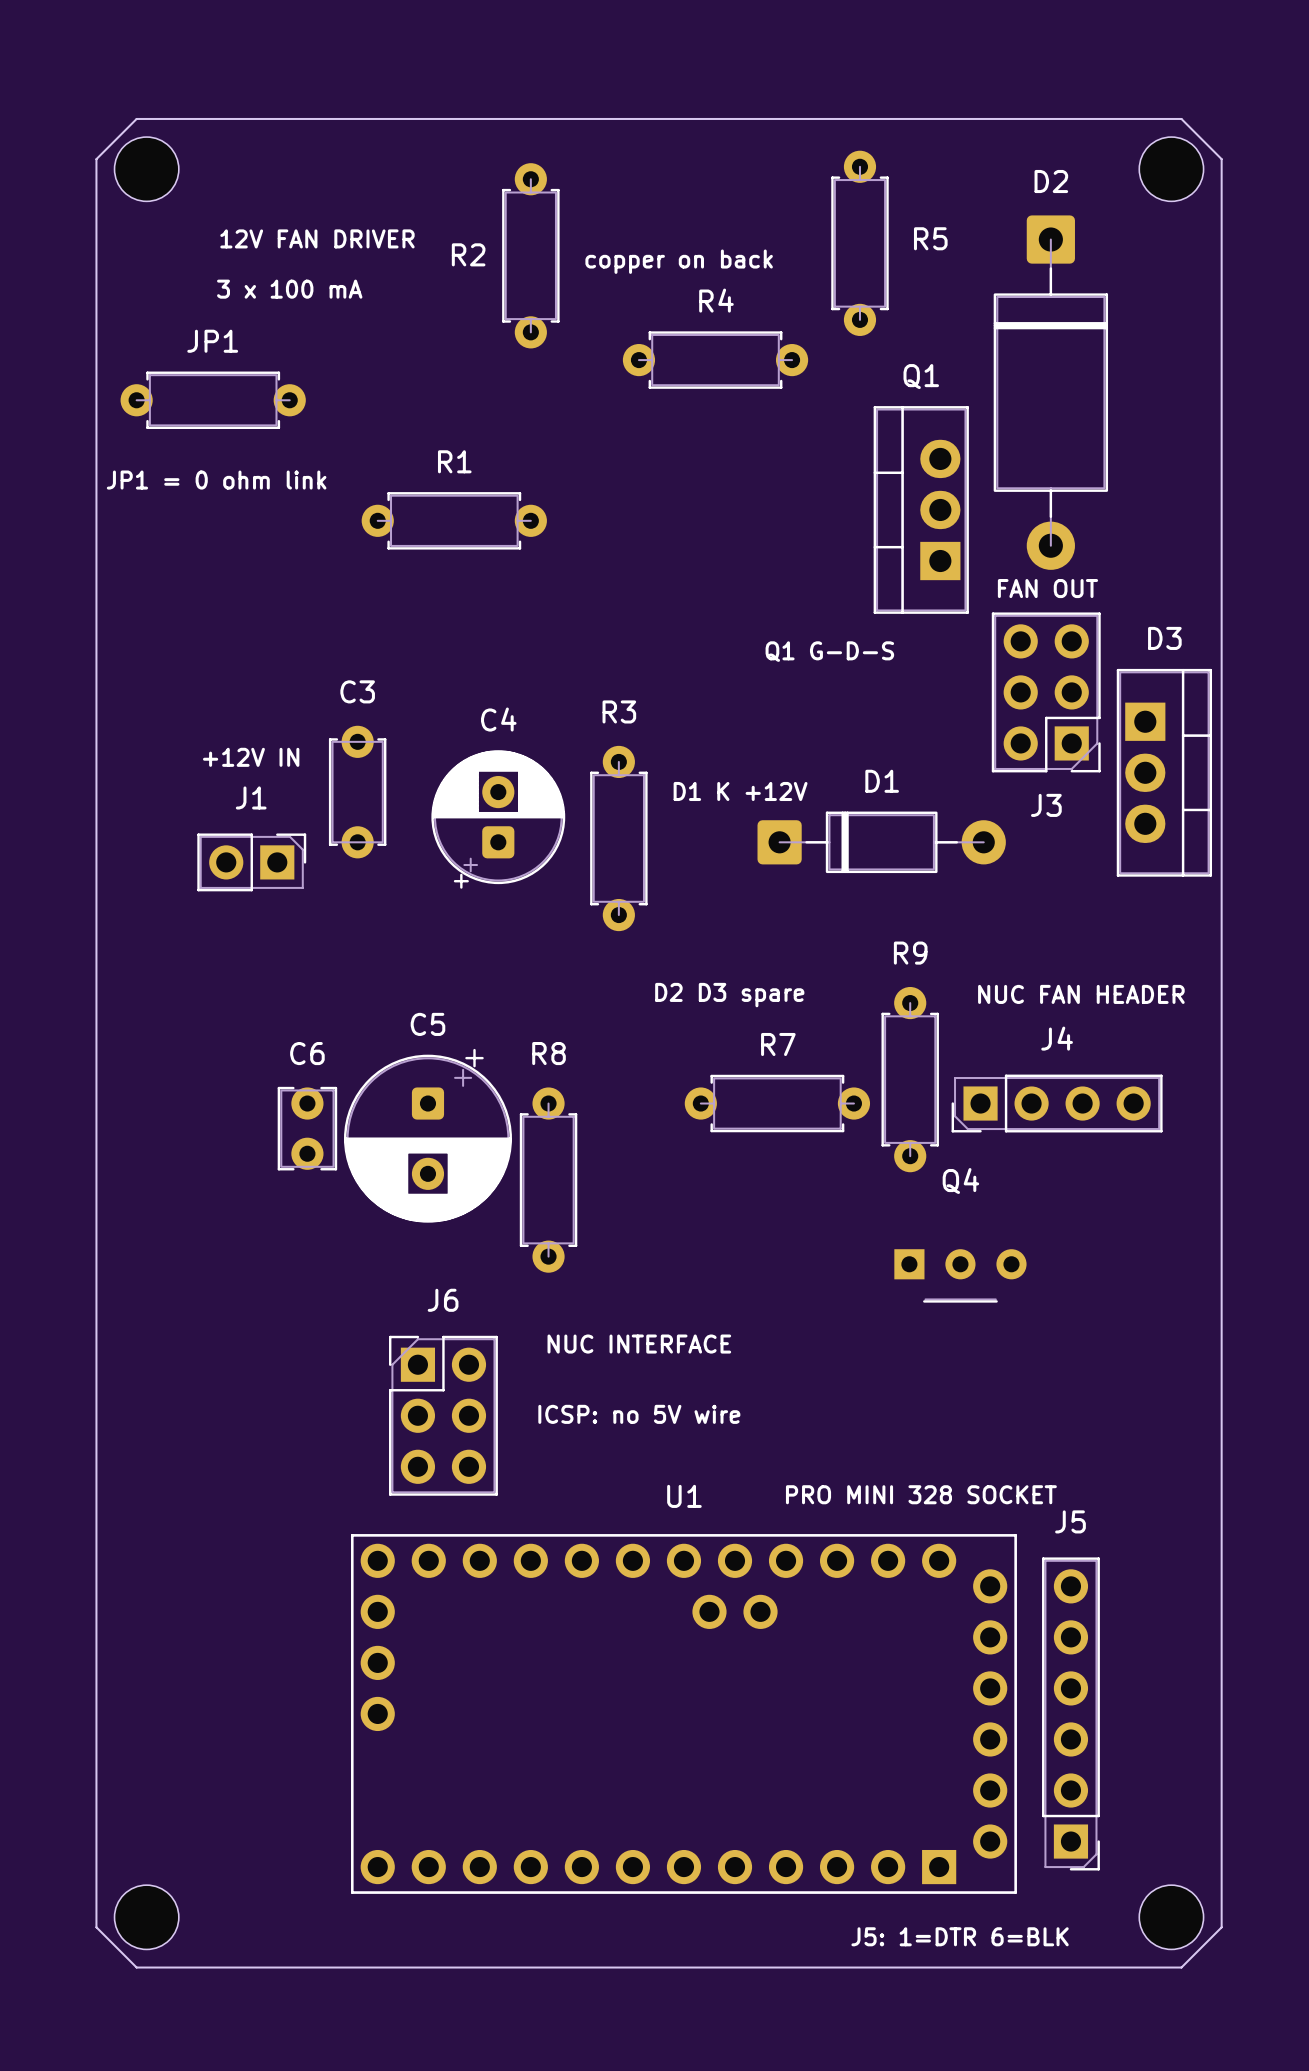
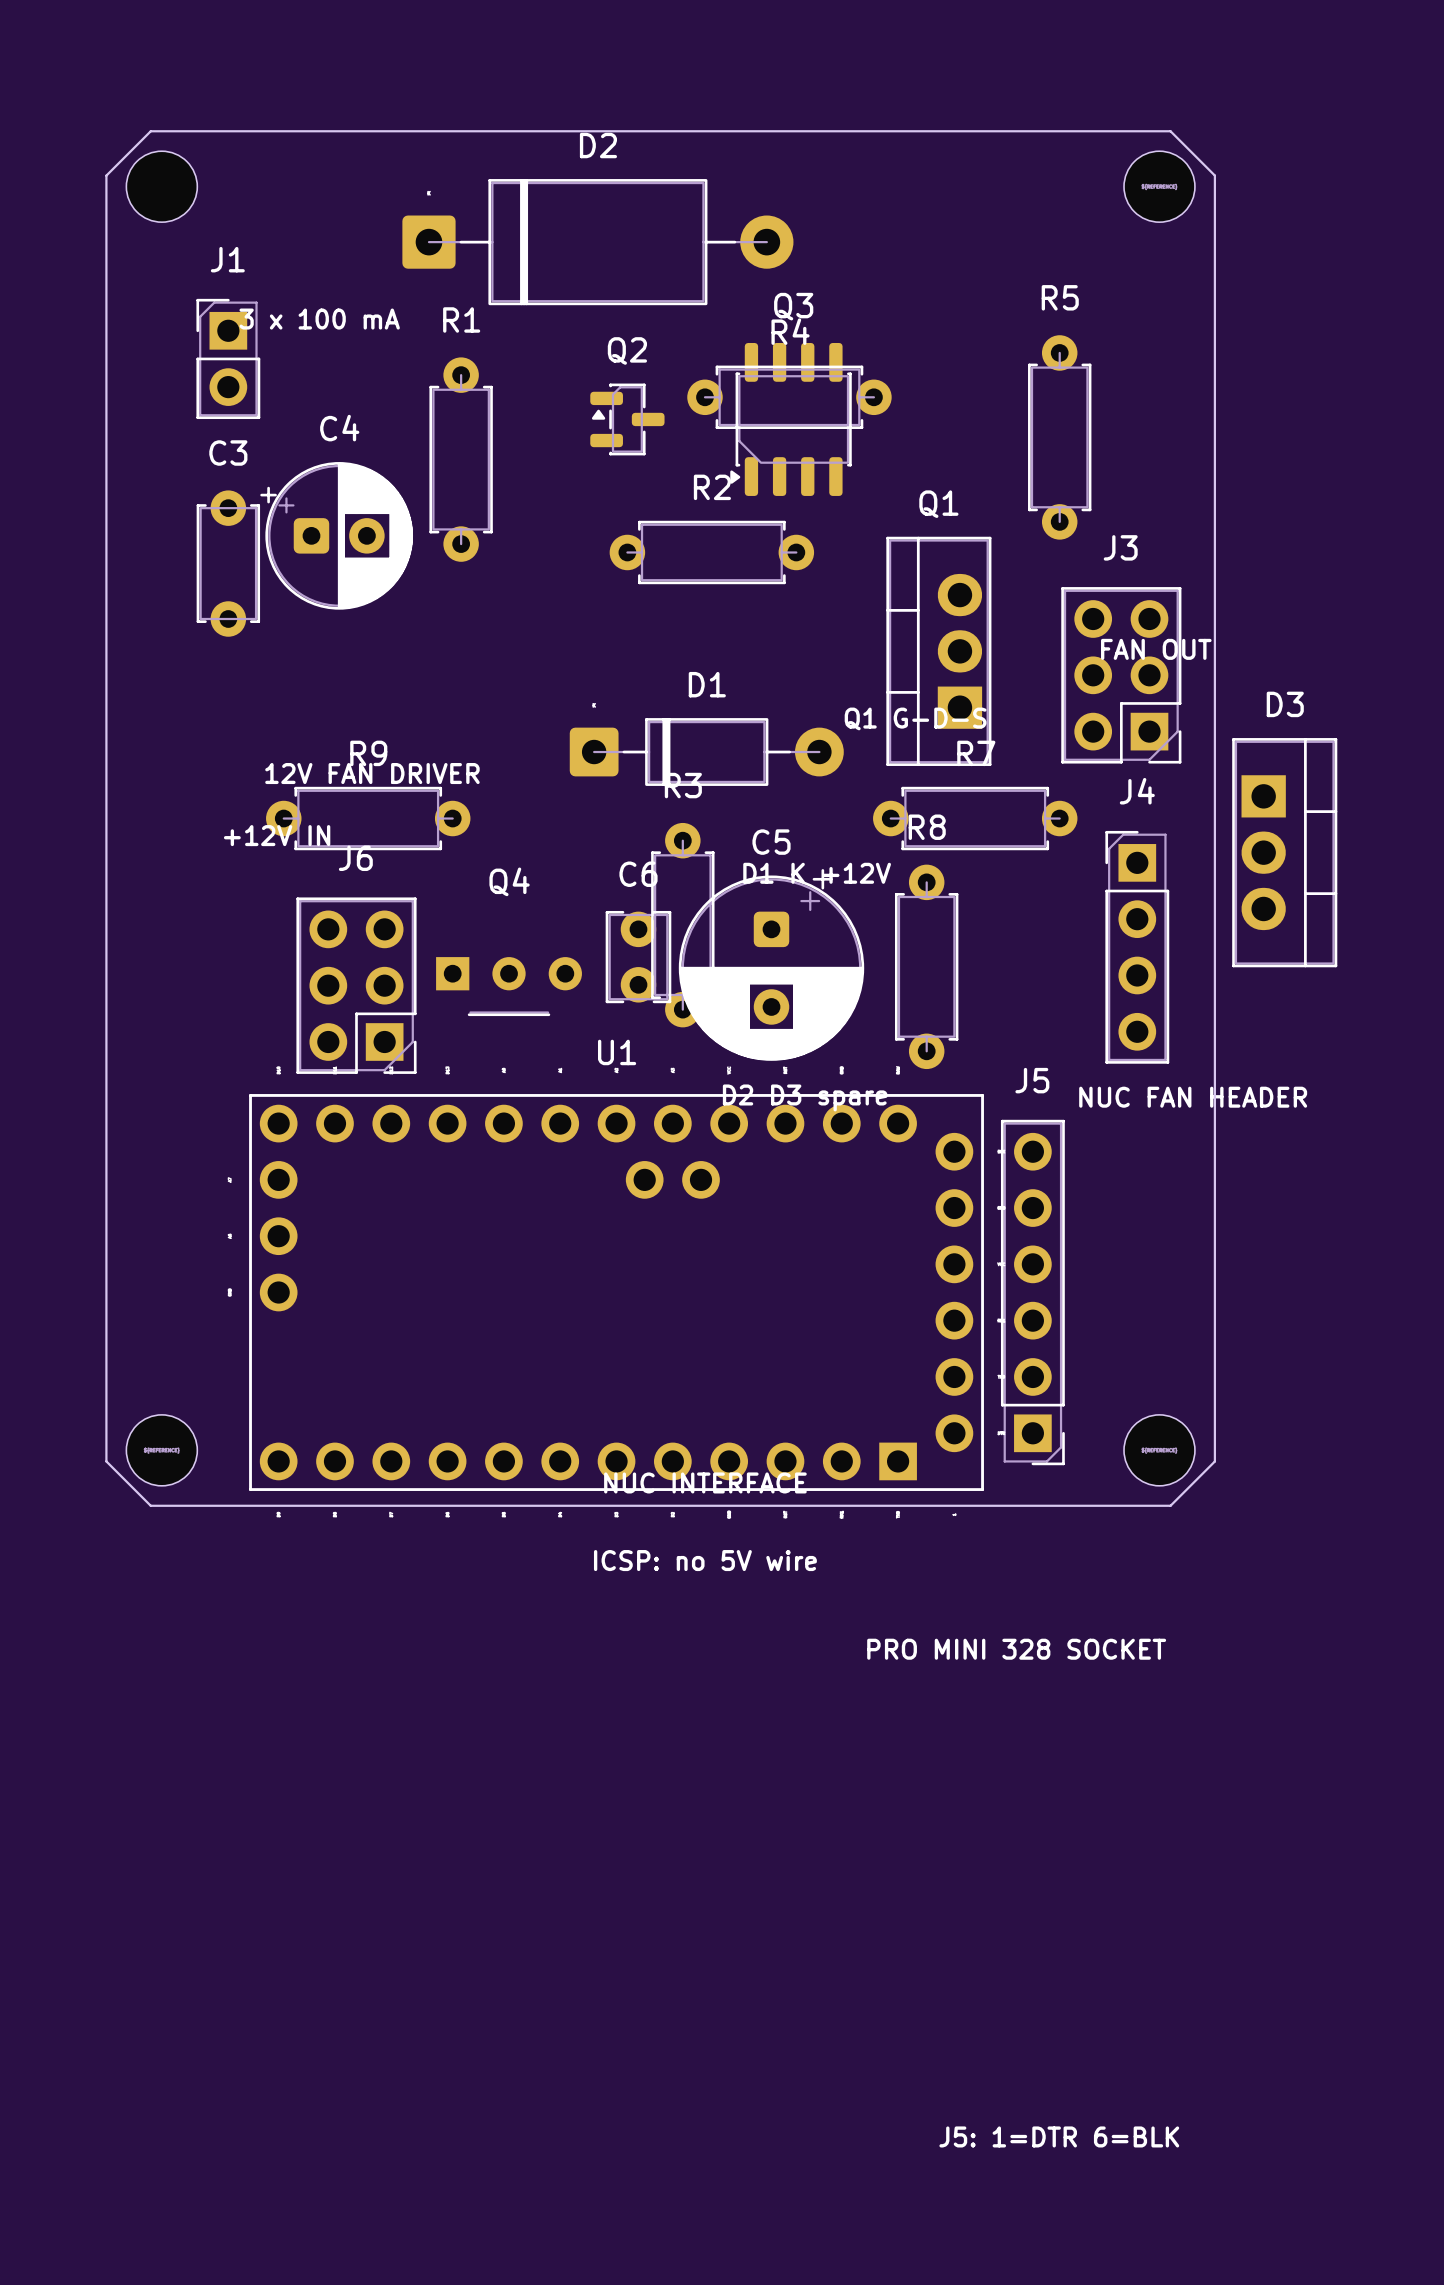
board edge: (1060, 118) (1181, 118) (1221, 159) (1221, 1927) (1181, 1967) (136, 1967) (96, 1927) (96, 1324) -> (1170, 131) (1214, 175) (1214, 1461) (1170, 1505) (150, 1505) (106, 1461)
part: none -> (1159, 186)
part: (1171, 169) -> none
D2 name position: D2 (1051, 181) -> D2 (598, 145)
D2 footprint: [993, 215, 1109, 570] -> [402, 179, 794, 306]
text position: 12V FAN DRIVER (317, 238) -> 12V FAN DRIVER (372, 773)
R5 name position: R5 (930, 238) -> R5 (1060, 297)
R5 position: (859, 243) -> (1059, 437)
R2 rotation: 0° (530, 255) -> 90° clockwise (711, 552)
R2 position: (530, 255) -> (711, 552)
text: copper on back (679, 261) -> none
Q2: none -> (627, 419)
Q3: none -> (791, 419)
JP1: (213, 400) -> none
R1 name position: R1 (454, 461) -> R1 (461, 319)
text: JP1 = 0 ohm link (216, 480) -> none
Q1 position: (921, 509) -> (938, 651)
R1 rotation: 0° (454, 520) -> 90° clockwise (461, 459)
J3 position: (1046, 692) -> (1121, 675)
C3 position: (357, 792) -> (228, 563)
J3 name position: J3 (1046, 805) -> J3 (1120, 547)
D1 footprint: [757, 811, 1006, 874] -> [569, 718, 844, 786]
C4 rotation: 0° (498, 819) -> 90° clockwise (336, 535)
C4 position: (498, 819) -> (336, 535)
J1 rotation: 0° (251, 862) -> 90° counterclockwise (228, 358)
J1 position: (251, 862) -> (228, 358)
R9 name position: R9 (910, 953) -> R9 (368, 753)
J4 name position: J4 (1057, 1038) -> J4 (1137, 791)
R9 rotation: 0° (910, 1079) -> 90° clockwise (368, 818)
R9 position: (910, 1079) -> (368, 818)
R7 position: (777, 1103) -> (975, 818)
J4 rotation: 0° (1057, 1103) -> 90° clockwise (1137, 947)
J4 position: (1057, 1103) -> (1137, 947)
C6 position: (307, 1128) -> (638, 957)
C5 position: (427, 1135) -> (771, 964)
R8 position: (548, 1180) -> (926, 966)
Q4 position: (960, 1275) -> (509, 986)
part: none -> (161, 1450)
part: none -> (1159, 1450)
J6 rotation: 0° (443, 1415) -> 180° (356, 985)
J6 position: (443, 1415) -> (356, 985)
U1 footprint: [351, 1534, 1017, 1894] -> [249, 1094, 984, 1491]
J5 position: (1070, 1713) -> (1032, 1292)
part: (146, 1917) -> none
part: (1171, 1917) -> none

